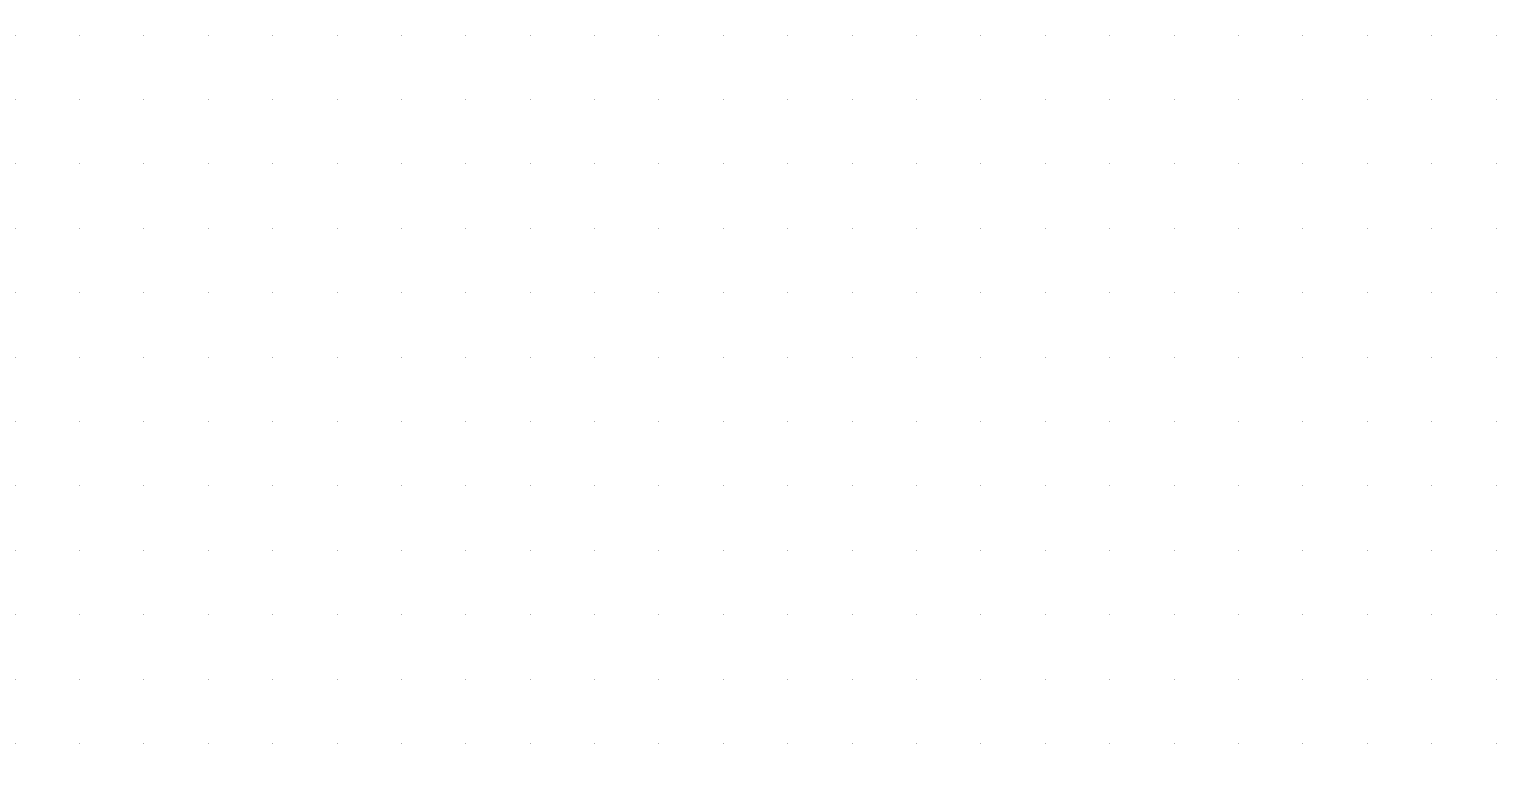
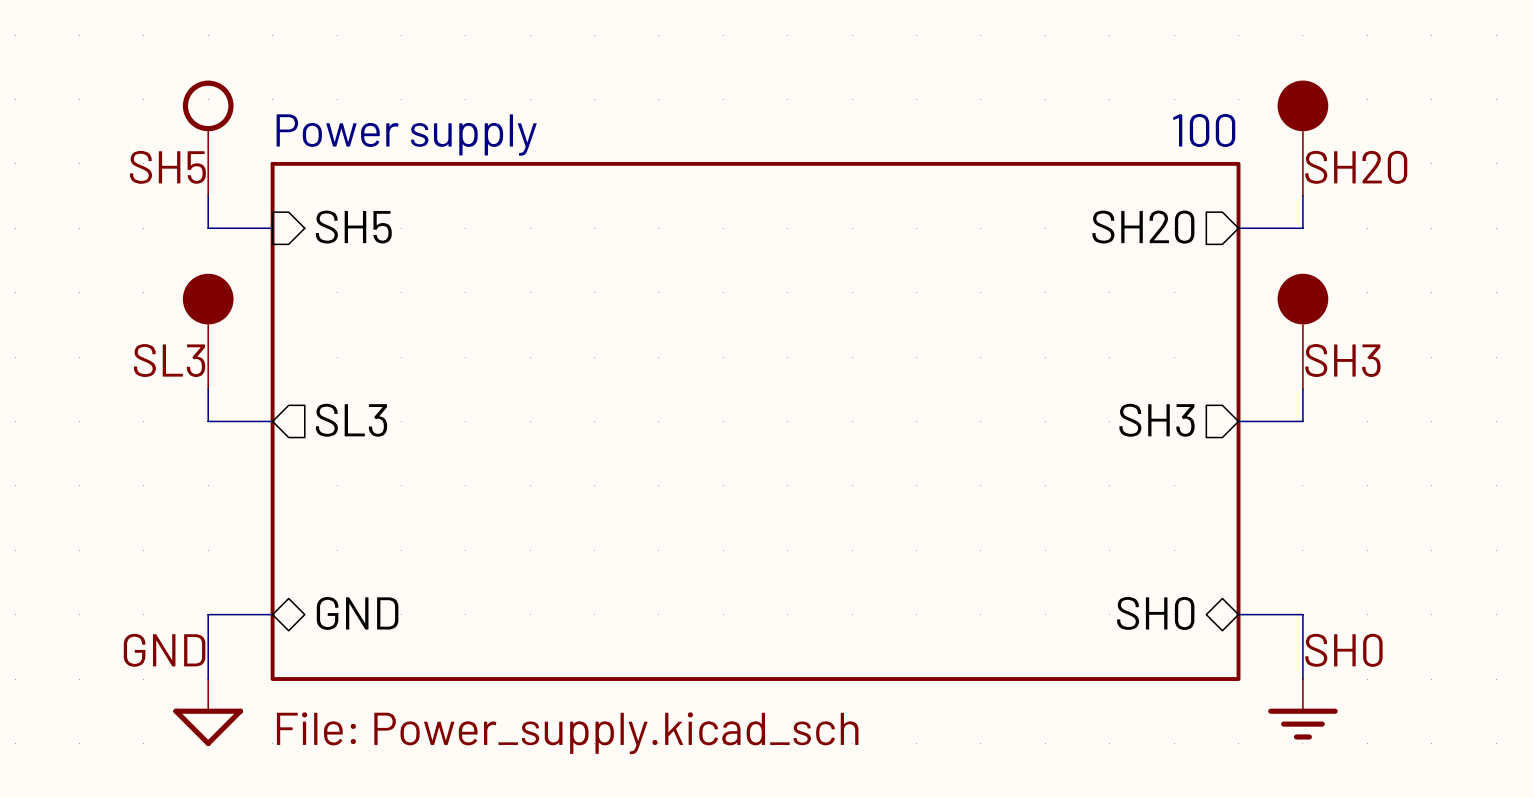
part: none -> (208, 138)
part: none -> (1302, 138)
label: none -> SH5 (167, 167)
label: none -> SH20 (1356, 167)
wire: none -> (208, 196) (208, 228) (272, 228)
wire: none -> (1302, 196) (1302, 228) (1238, 228)
sheet pin: none -> SH5 (353, 227)
sheet pin: none -> SH20 (1143, 227)
part: none -> (208, 331)
part: none -> (1302, 331)
label: none -> SL3 (169, 360)
label: none -> SH3 (1342, 360)
wire: none -> (208, 389) (208, 421) (272, 421)
wire: none -> (1302, 389) (1302, 421) (1238, 421)
sheet pin: none -> SL3 (351, 420)
sheet pin: none -> SH3 (1157, 420)
sheet Power supply: none -> File: Power_supply.kicad_sch (755, 421)
sheet pin: none -> GND (357, 613)
sheet pin: none -> SH0 (1155, 613)
wire: none -> (272, 614) (208, 614) (208, 679)
wire: none -> (1238, 614) (1302, 614) (1302, 679)
label: none -> GND (164, 650)
label: none -> SH0 (1343, 650)
part: none -> (1302, 709)
part: none -> (208, 712)

